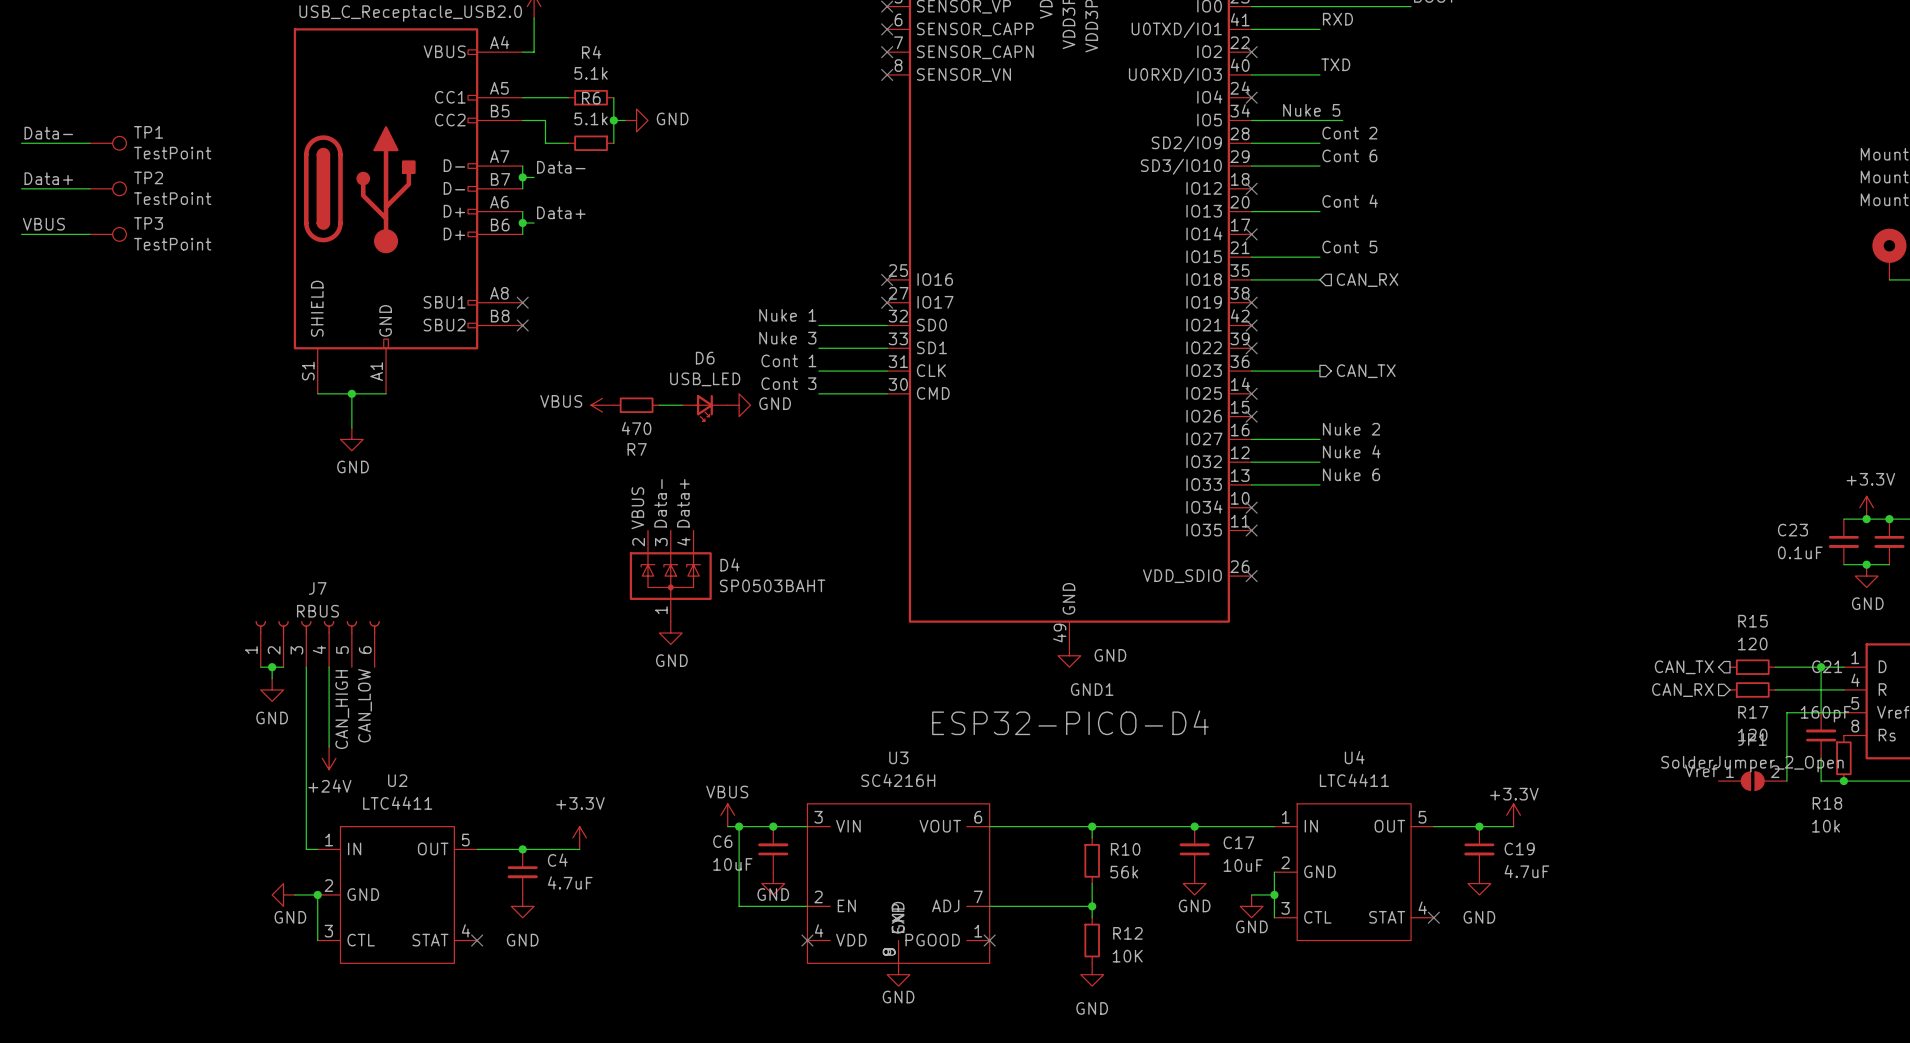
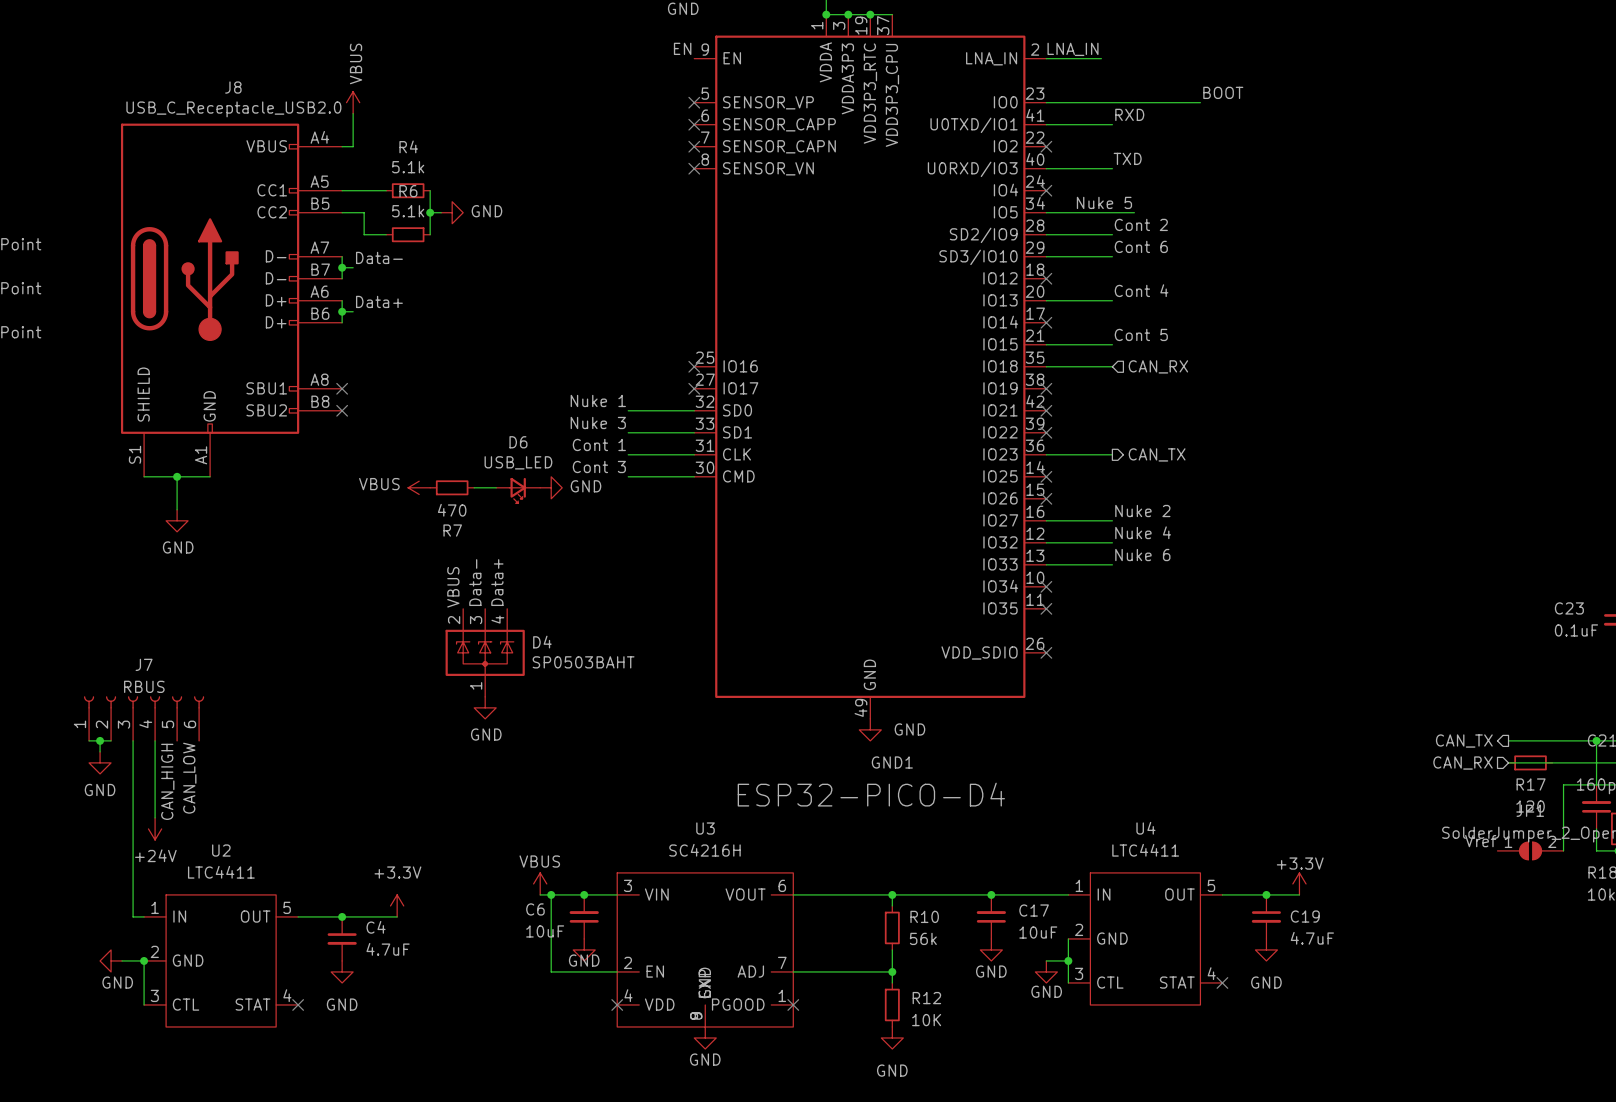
wire: none -> (1508, 740) (1552, 740)
R15: 120 (1752, 667) -> none
wire: none -> (1508, 762) (1552, 762)

